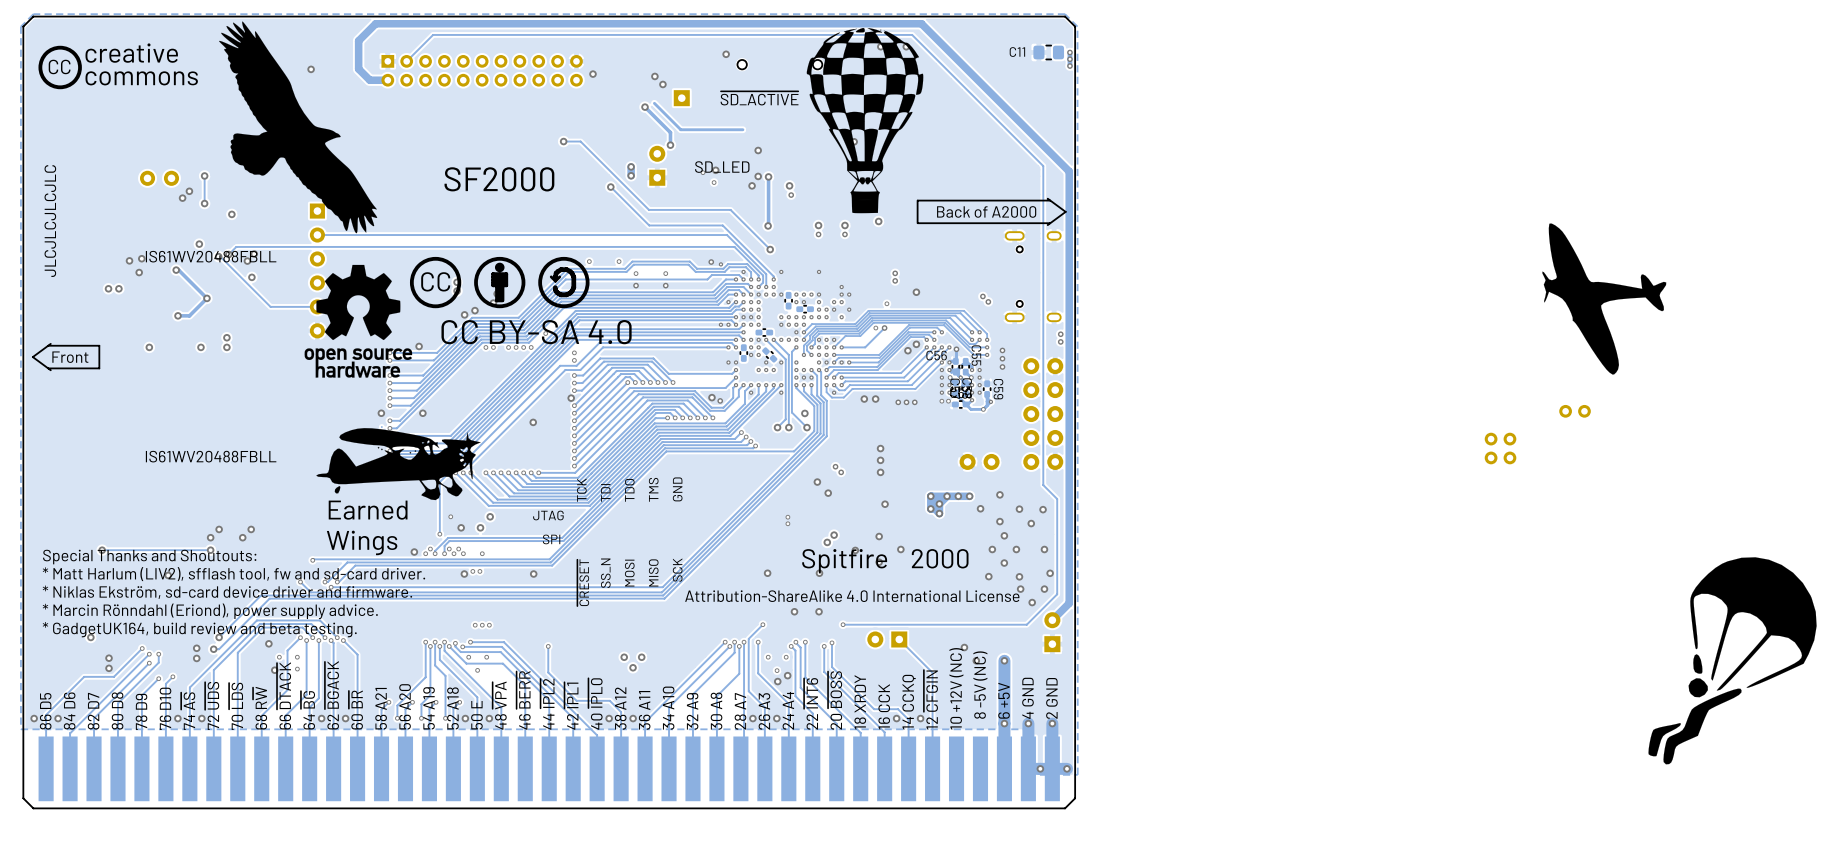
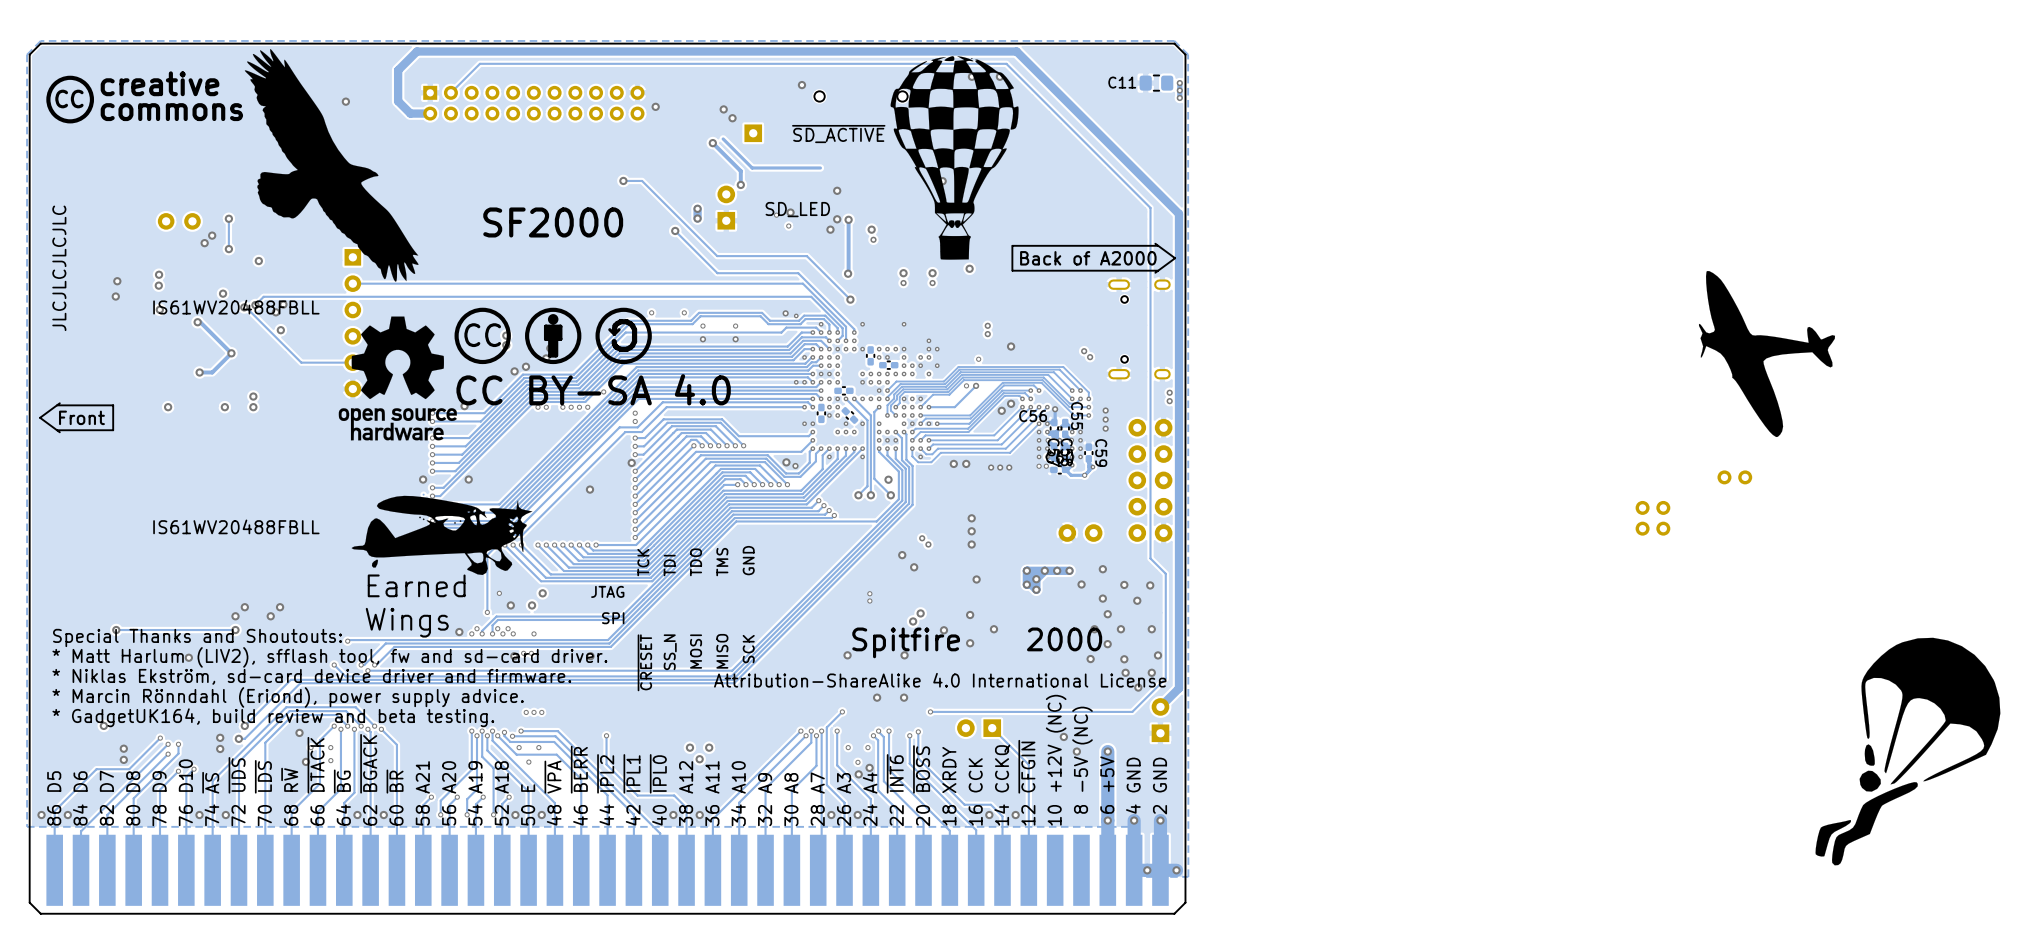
via: none -> (159, 274)
via: none -> (117, 281)
via: none -> (158, 285)
via: none -> (115, 296)
via: (129, 260) -> none
via: (139, 272) -> none
via: (108, 288) -> none
via: (118, 288) -> none

